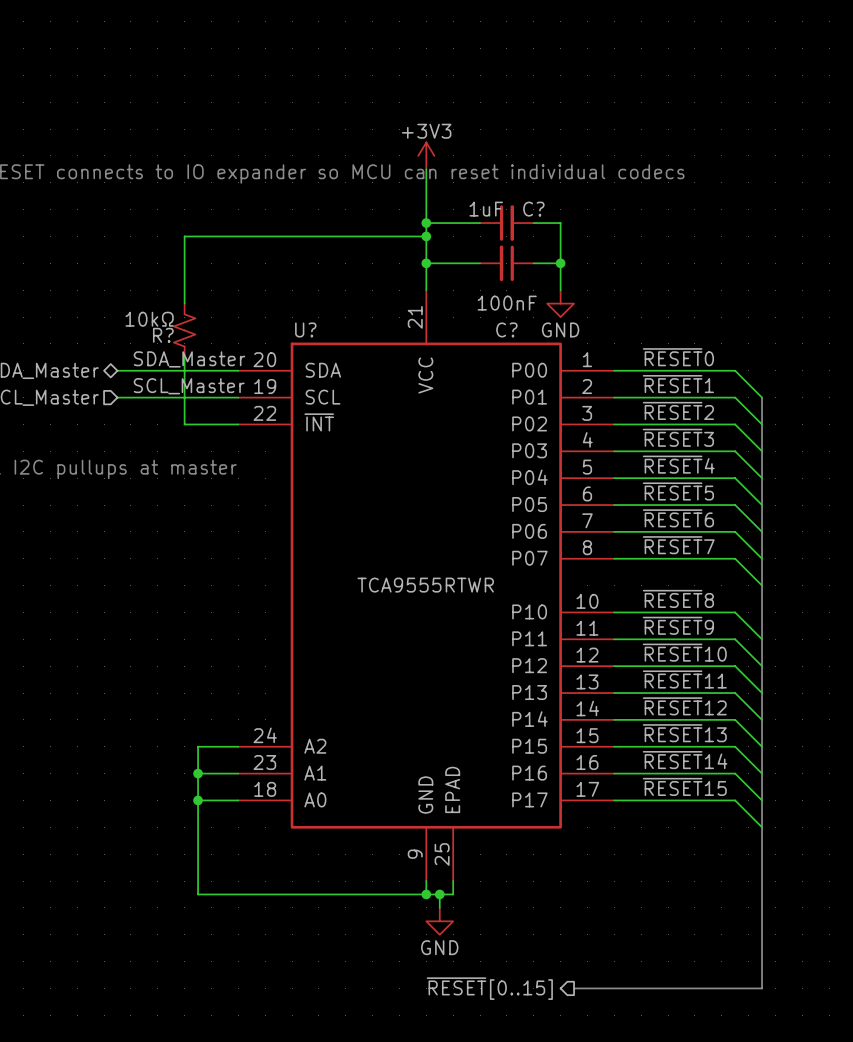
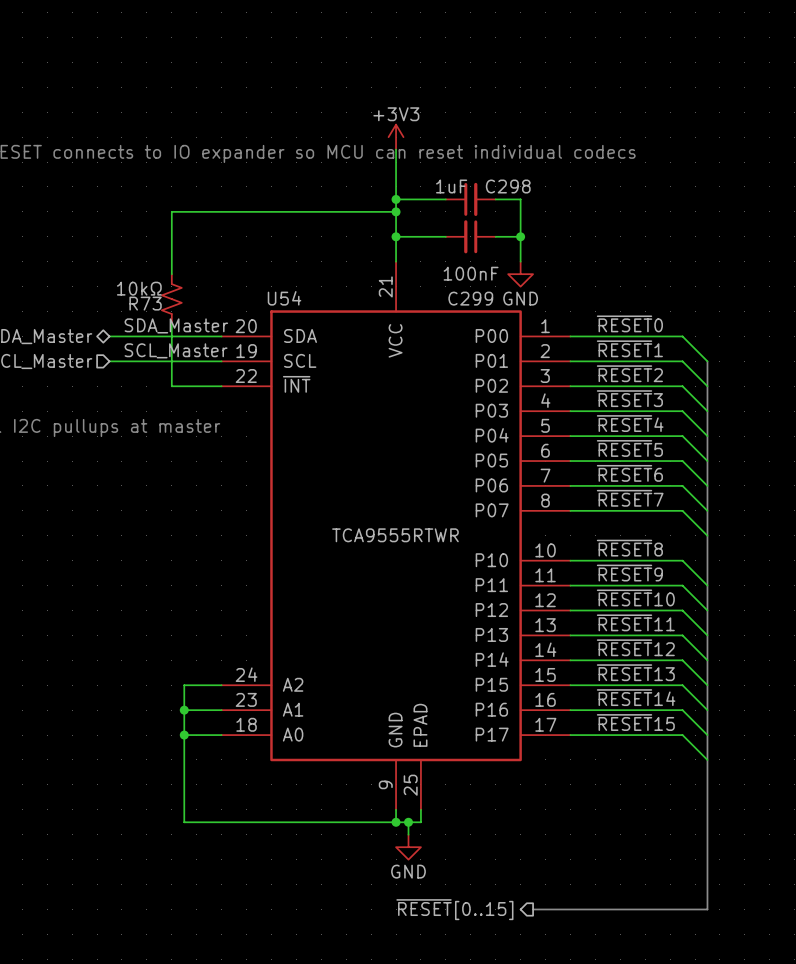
C? name: C? (533, 209) -> C298 (508, 186)
U? name: U? (305, 329) -> U54 (284, 298)
C? name: C? (506, 329) -> C299 (470, 298)
R? name: R? (163, 335) -> R73 (145, 303)

